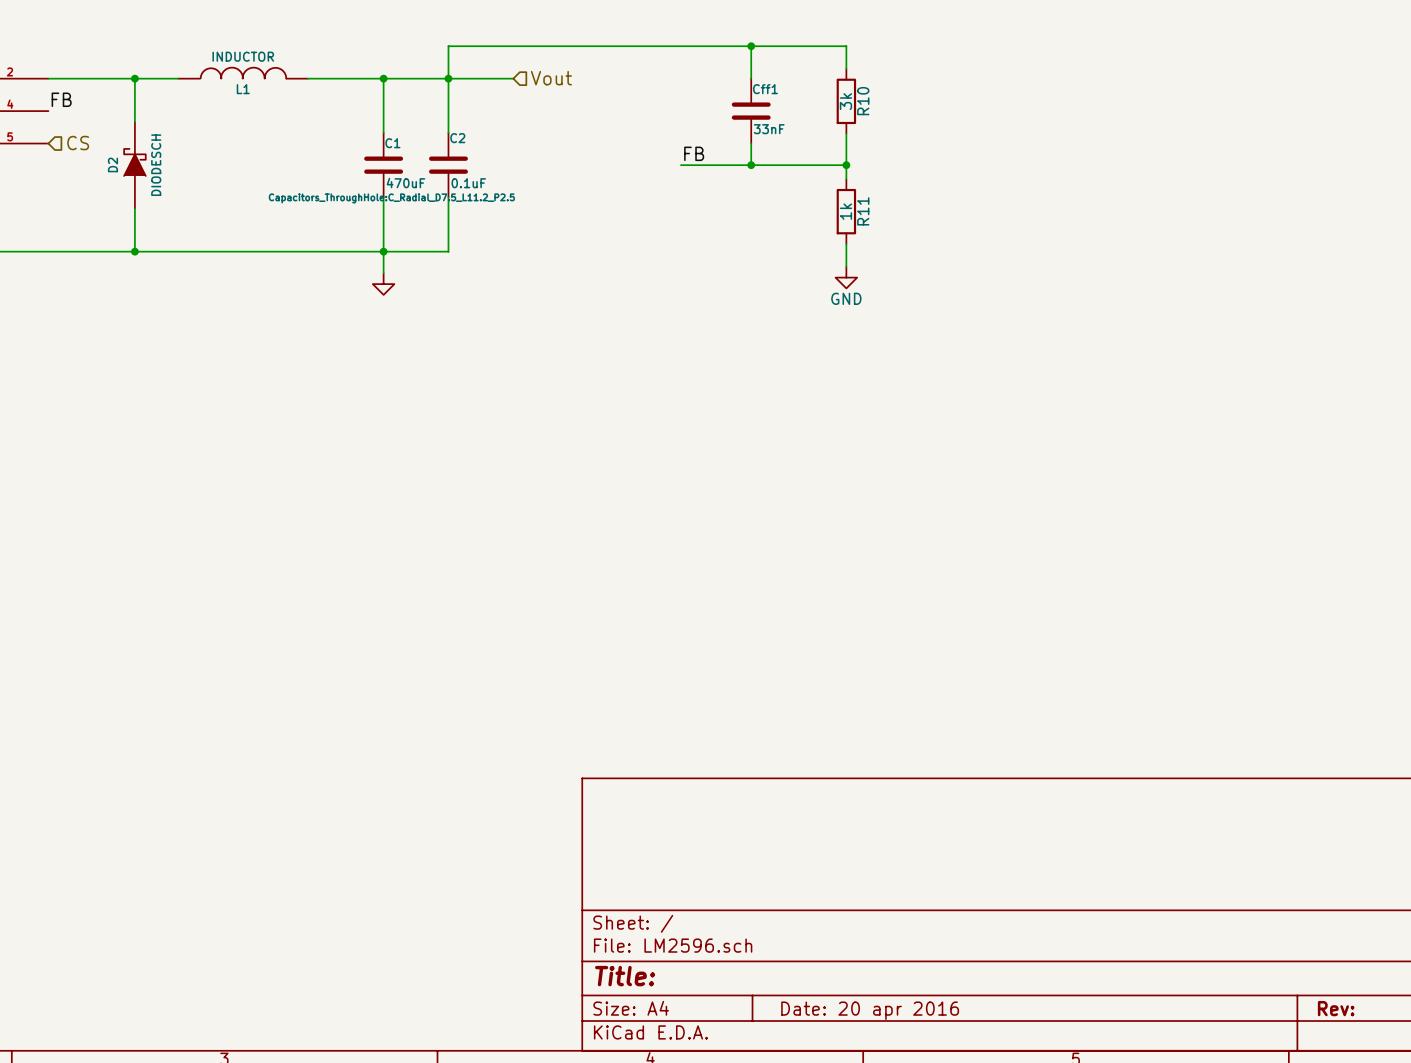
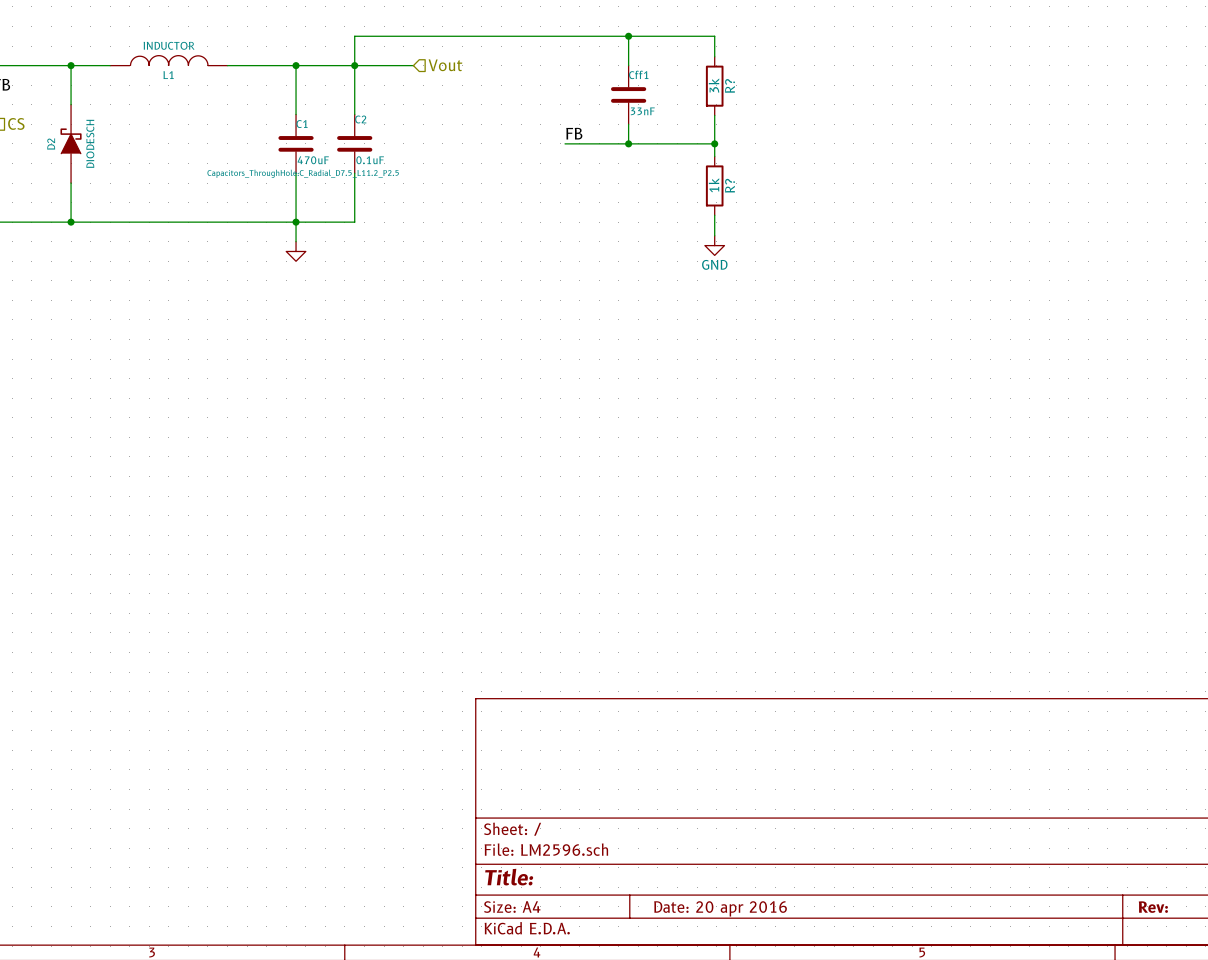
R10 name: R10 (863, 101) -> R? (730, 85)
R11 name: R11 (863, 211) -> R? (730, 185)

